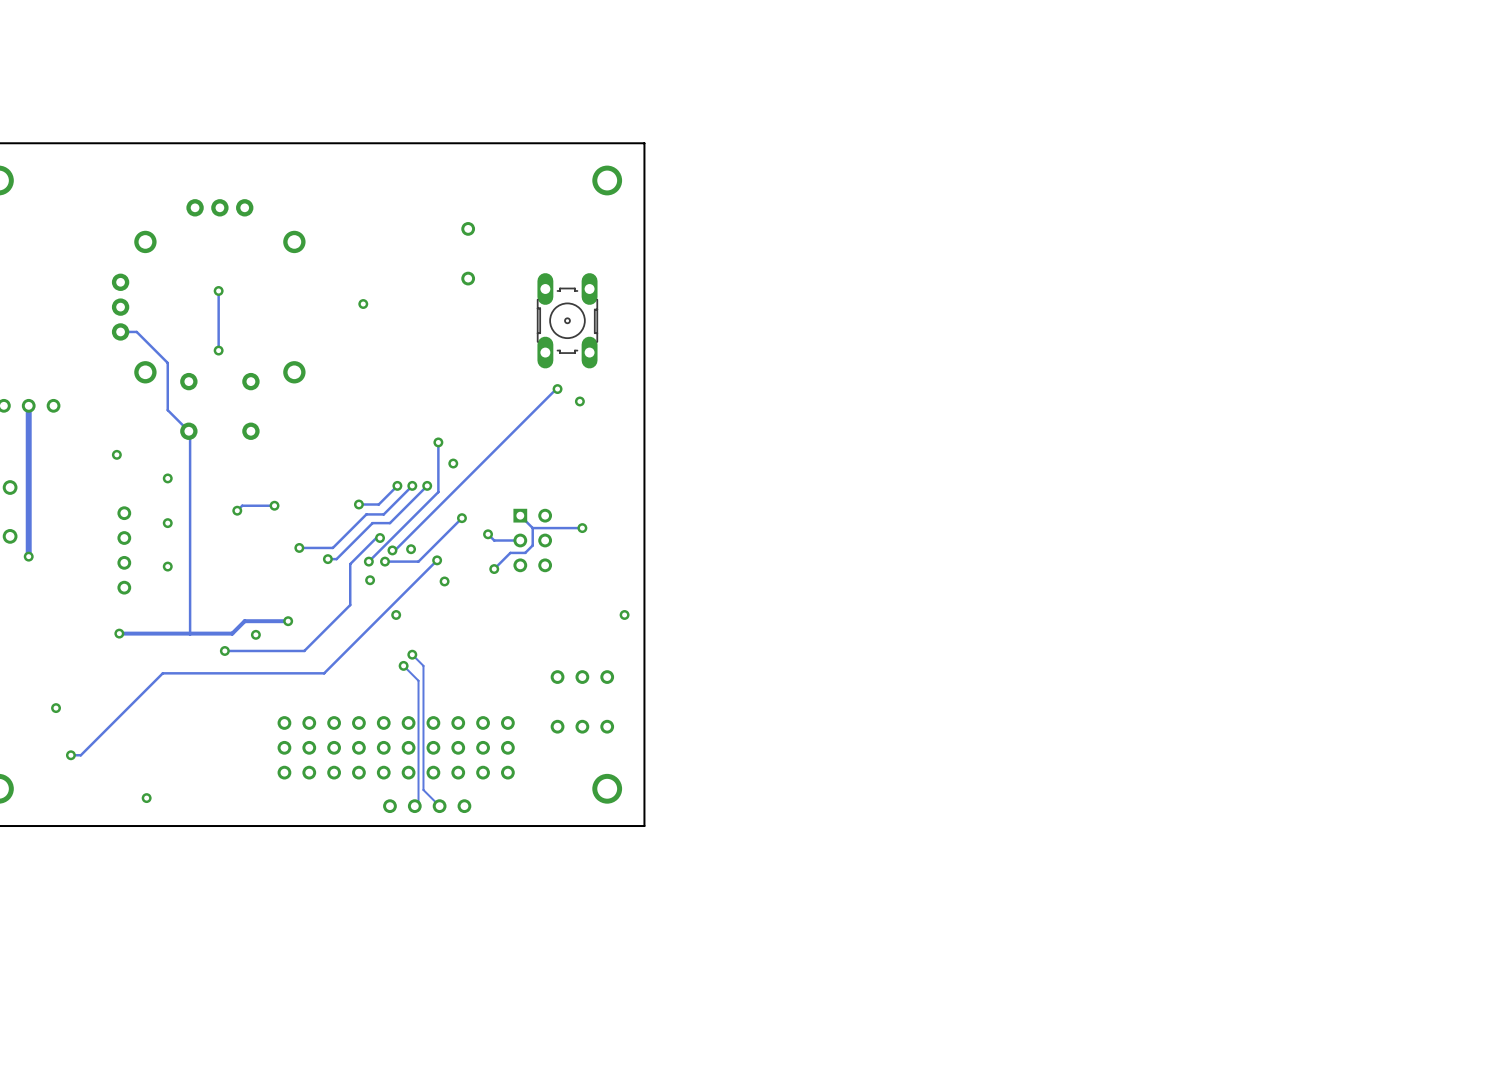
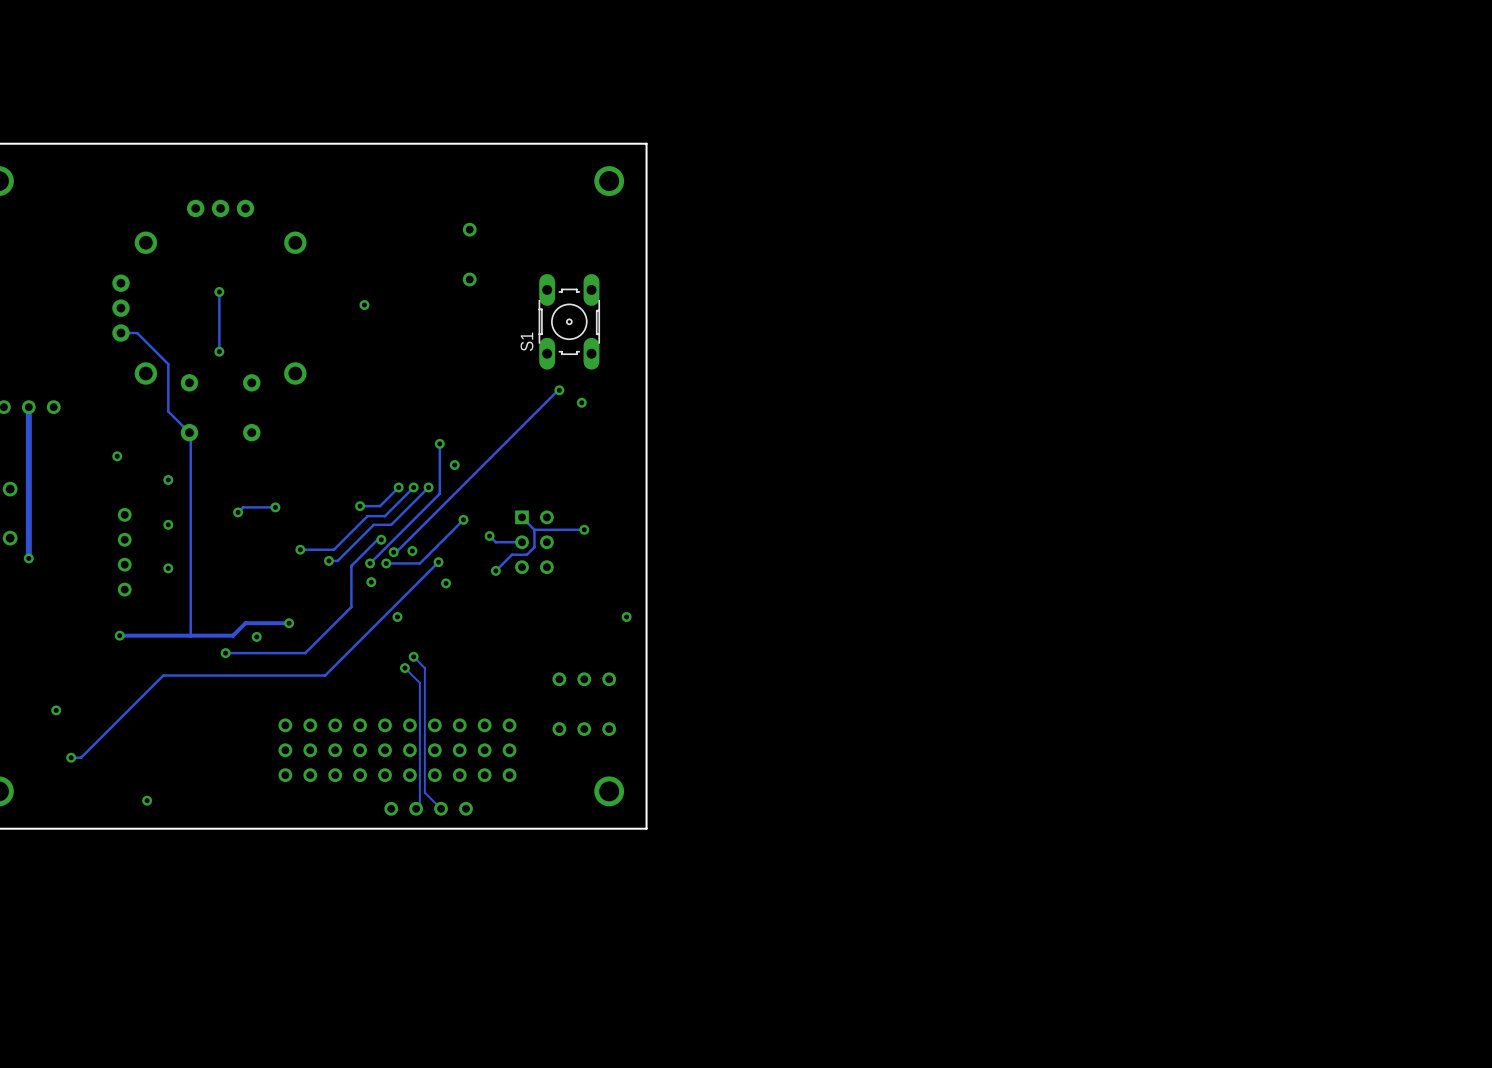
S1 name: none -> S1 (526, 341)

